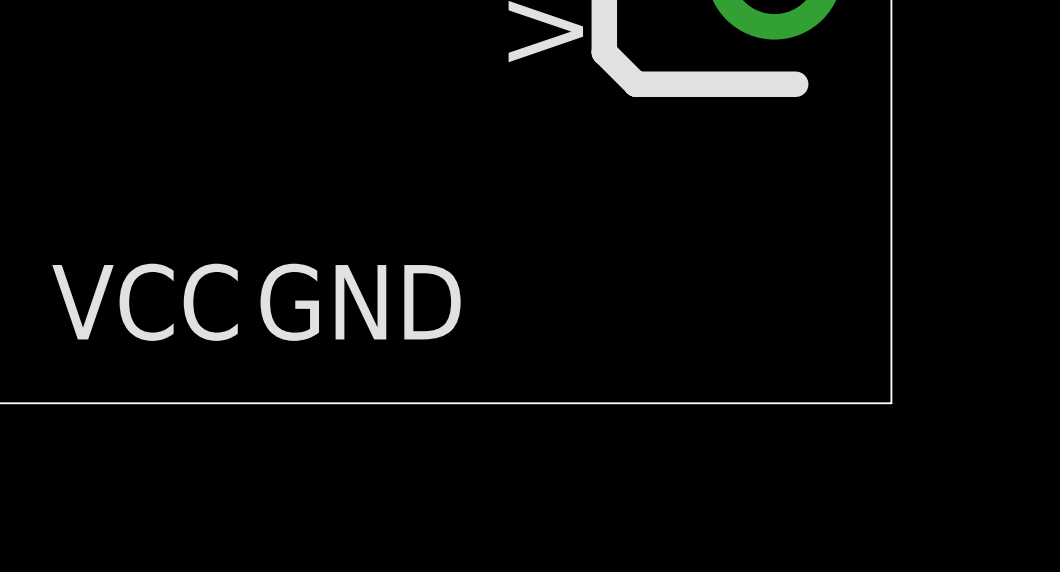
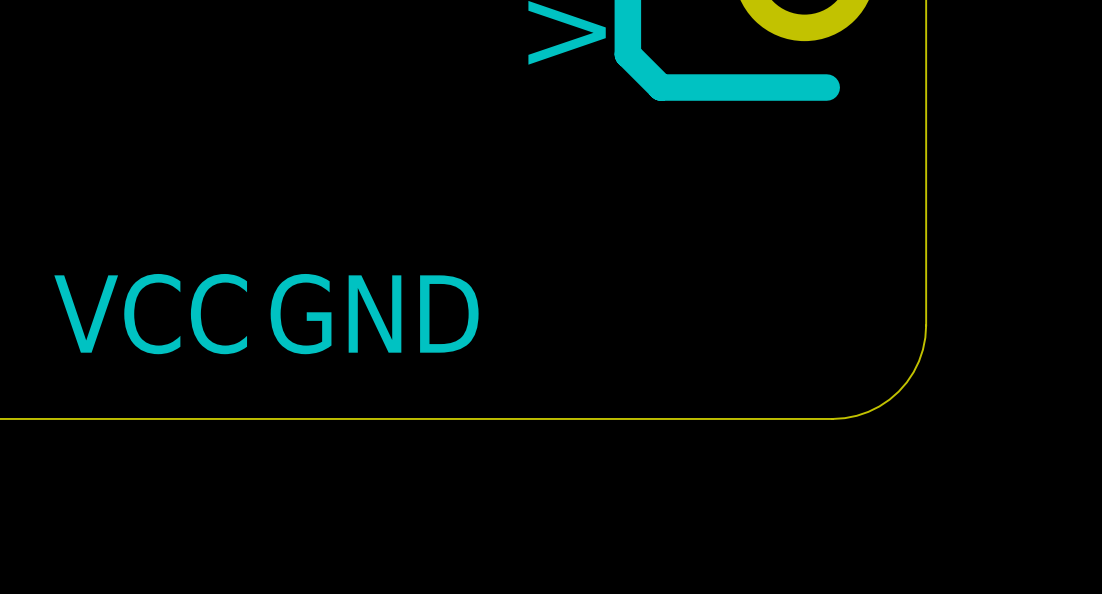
board edge: (891, 313) (891, 403) (801, 403) -> (926, 325) (922, 349) (919, 361) (913, 372) (898, 391) (879, 406) (868, 411) (856, 415) (832, 418)

